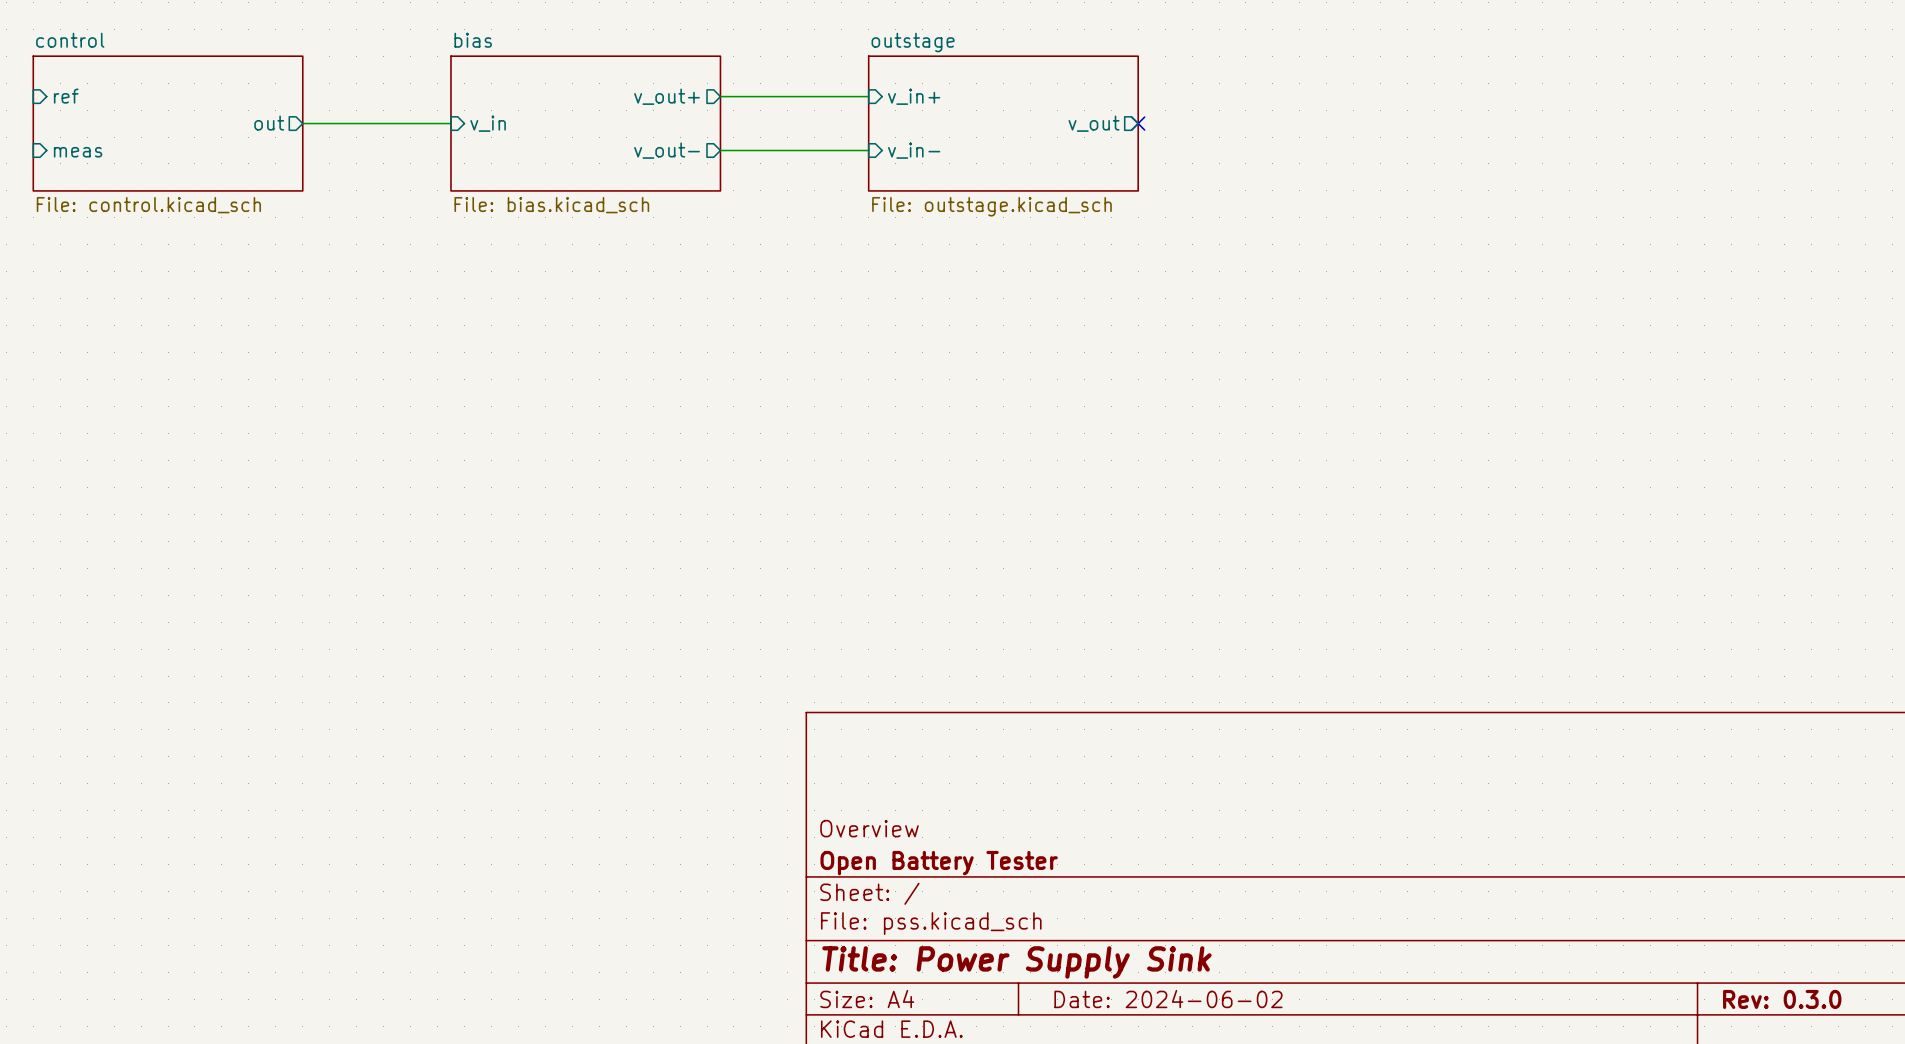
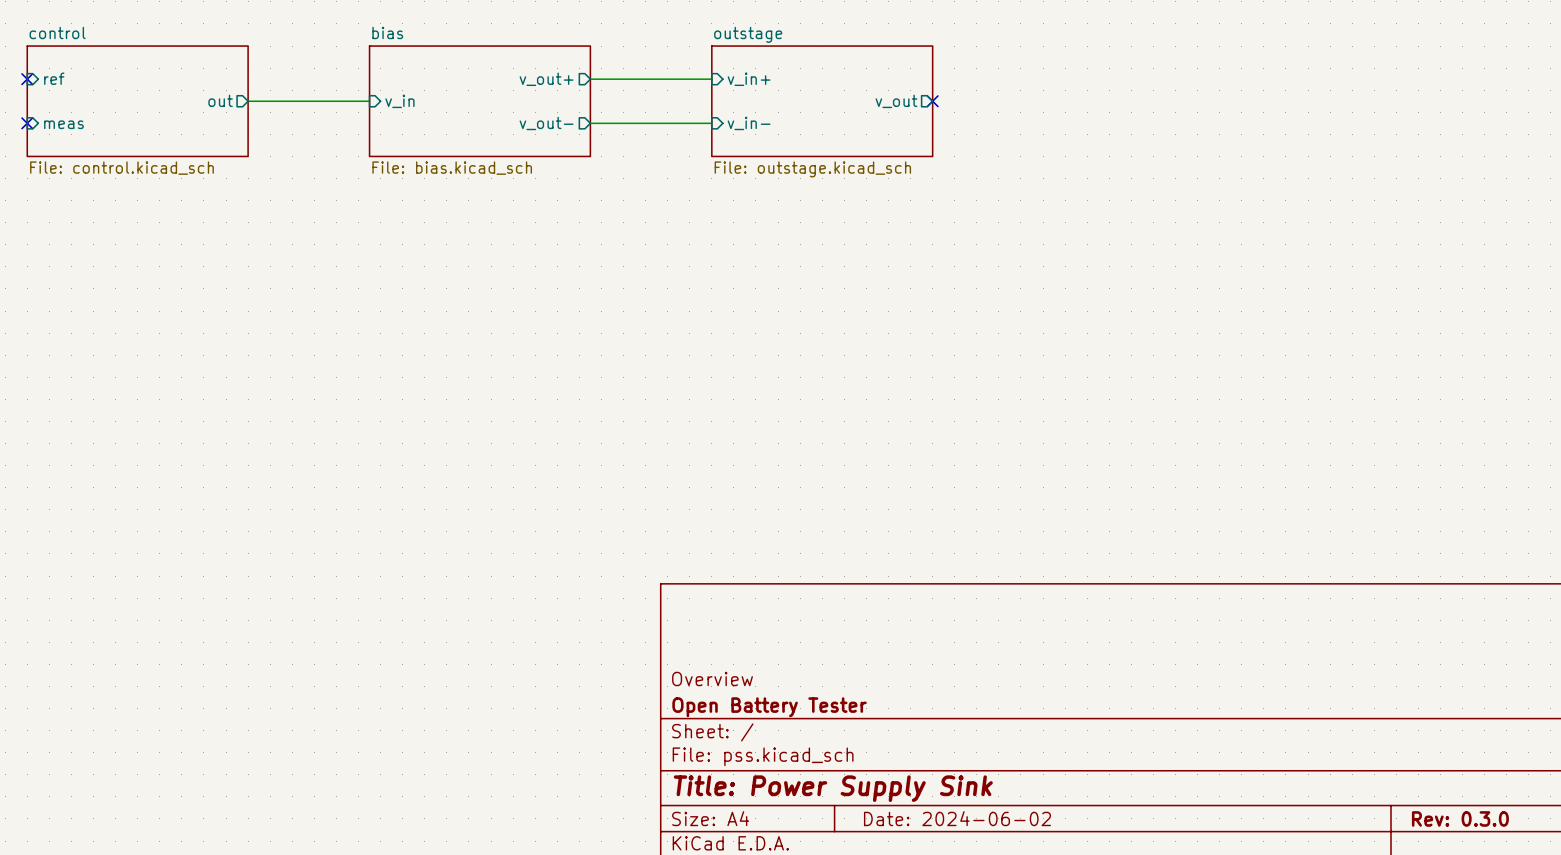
no-connect mark: none -> (27, 79)
no-connect mark: none -> (27, 123)

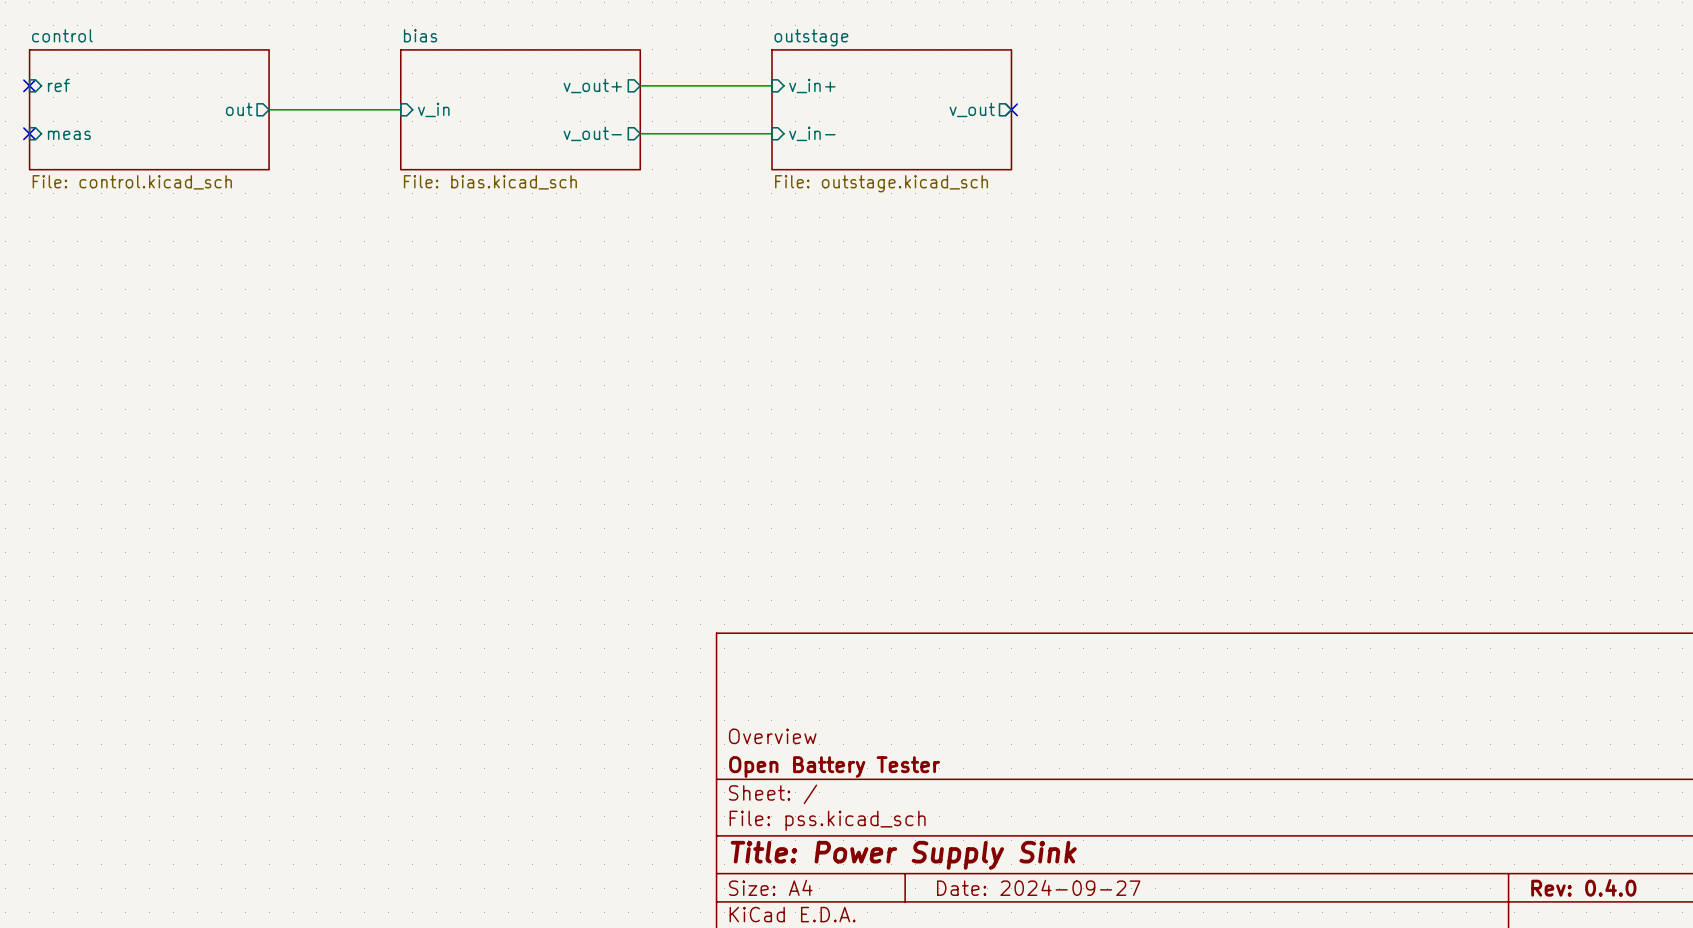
title block: Date: 2024-06-02 (957, 818) -> Date: 2024-09-27 (1038, 887)
title block: Rev: 0.3.0 (1460, 818) -> Rev: 0.4.0 (1583, 887)

